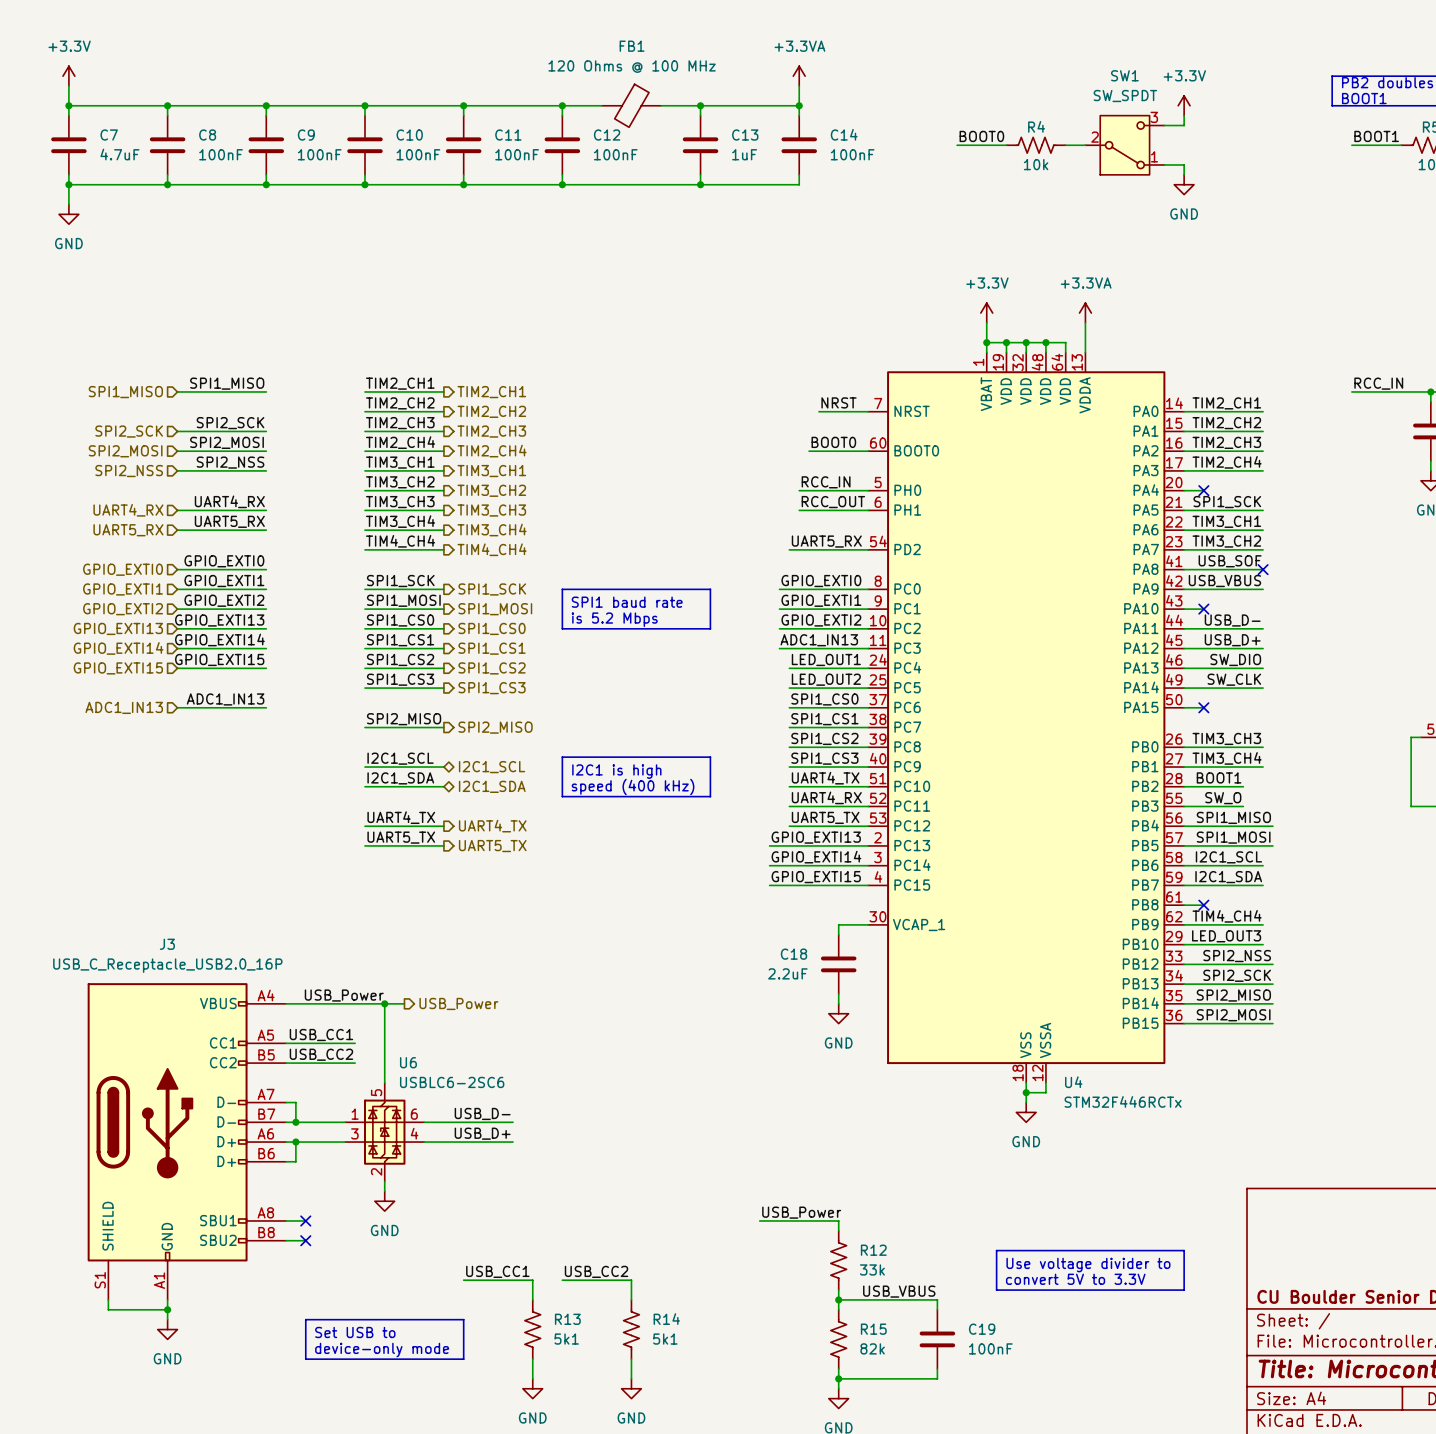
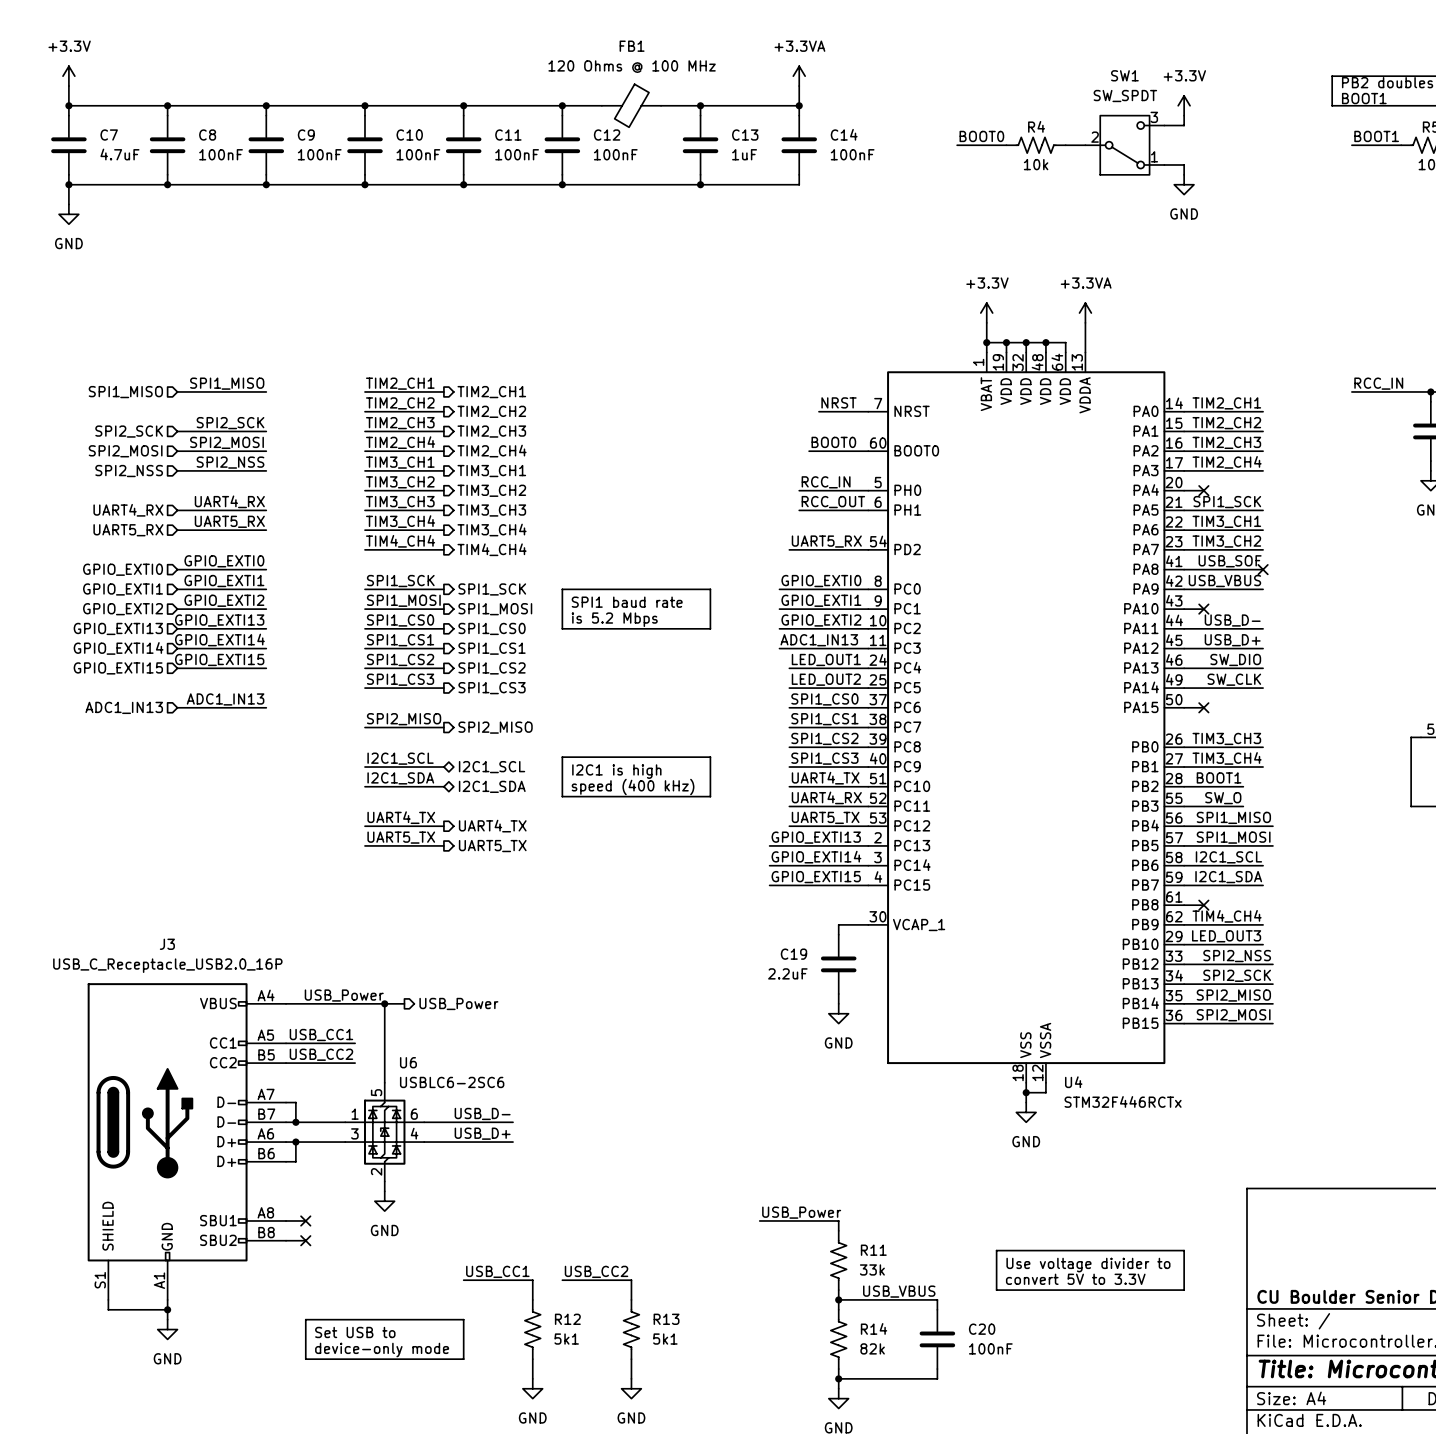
C18 name: C18 (793, 954) -> C19 (793, 954)
R12 name: R12 (873, 1250) -> R11 (873, 1250)
R13 name: R13 (567, 1319) -> R12 (567, 1319)
R14 name: R14 (666, 1319) -> R13 (666, 1319)
R15 name: R15 (873, 1329) -> R14 (874, 1328)
C19 name: C19 (982, 1329) -> C20 (982, 1329)

